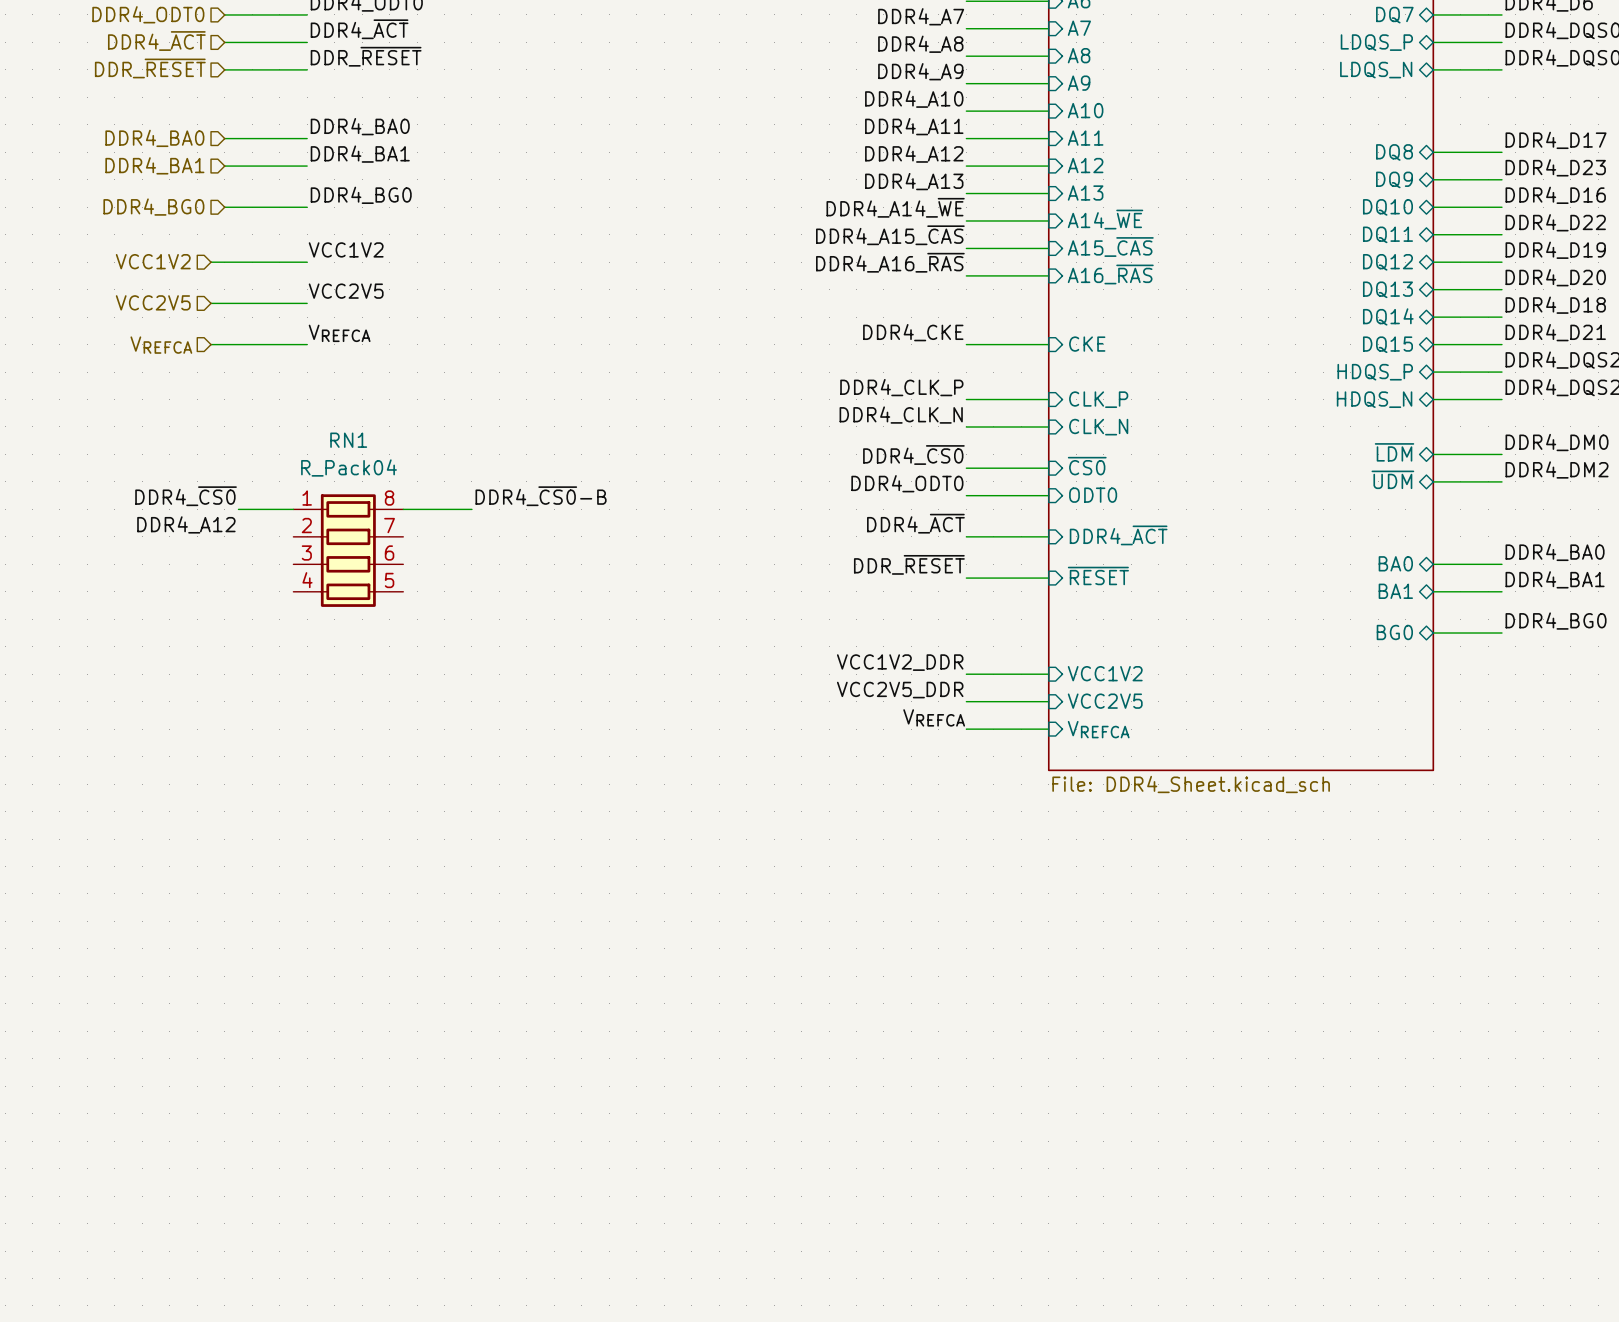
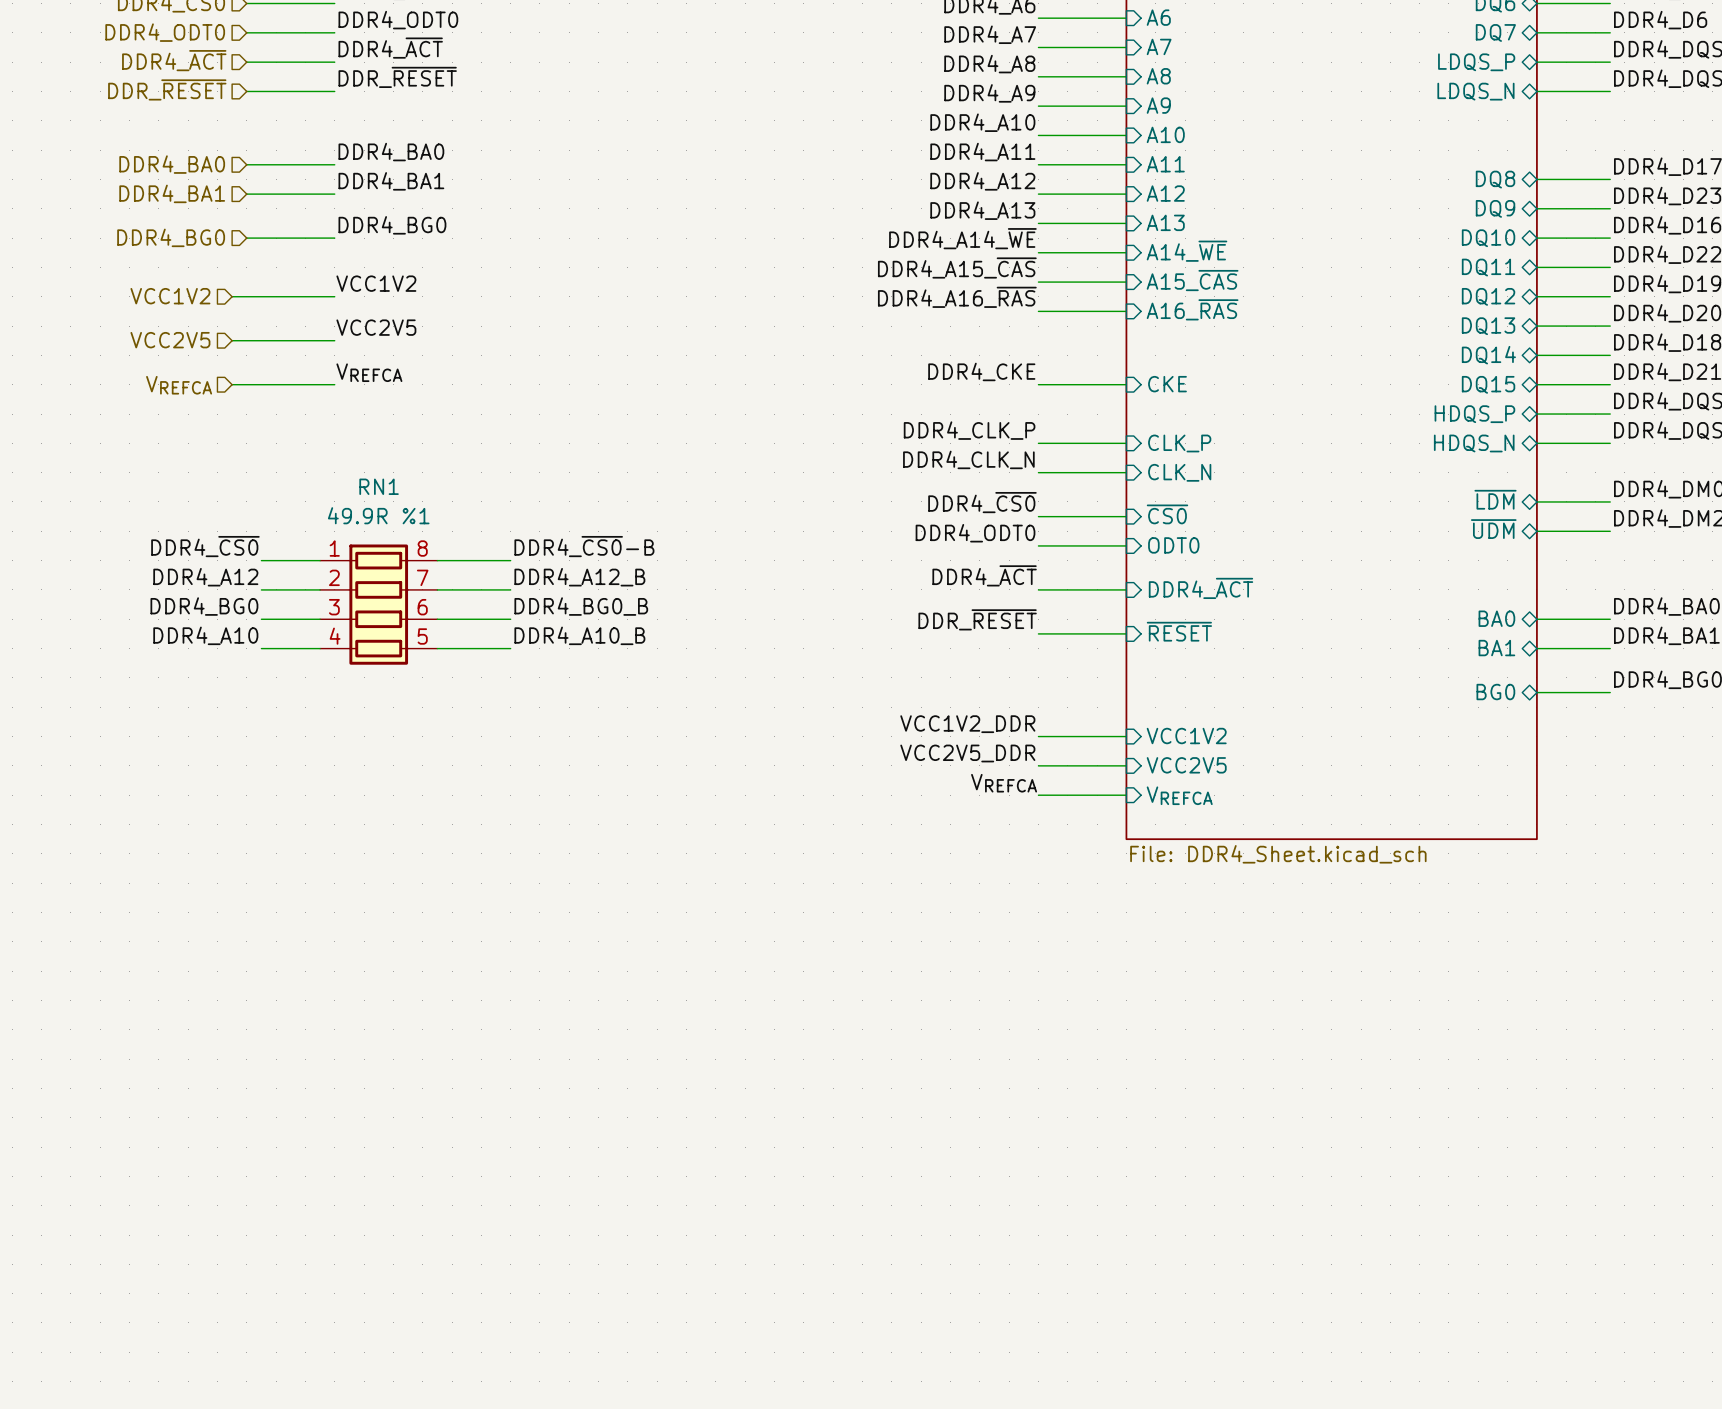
RN1 value: R_Pack04 (349, 468) -> 49.9R %1 (378, 515)
label: none -> DDR4_A12_B (579, 577)
wire: none -> (261, 589) (320, 589)
wire: none -> (437, 589) (510, 589)
label: none -> DDR4_BG0 (204, 606)
label: none -> DDR4_BG0_B (581, 606)
wire: none -> (261, 619) (320, 619)
wire: none -> (437, 619) (510, 619)
label: none -> DDR4_A10 (205, 635)
label: none -> DDR4_A10_B (579, 635)
wire: none -> (261, 648) (320, 648)
wire: none -> (437, 648) (510, 648)

